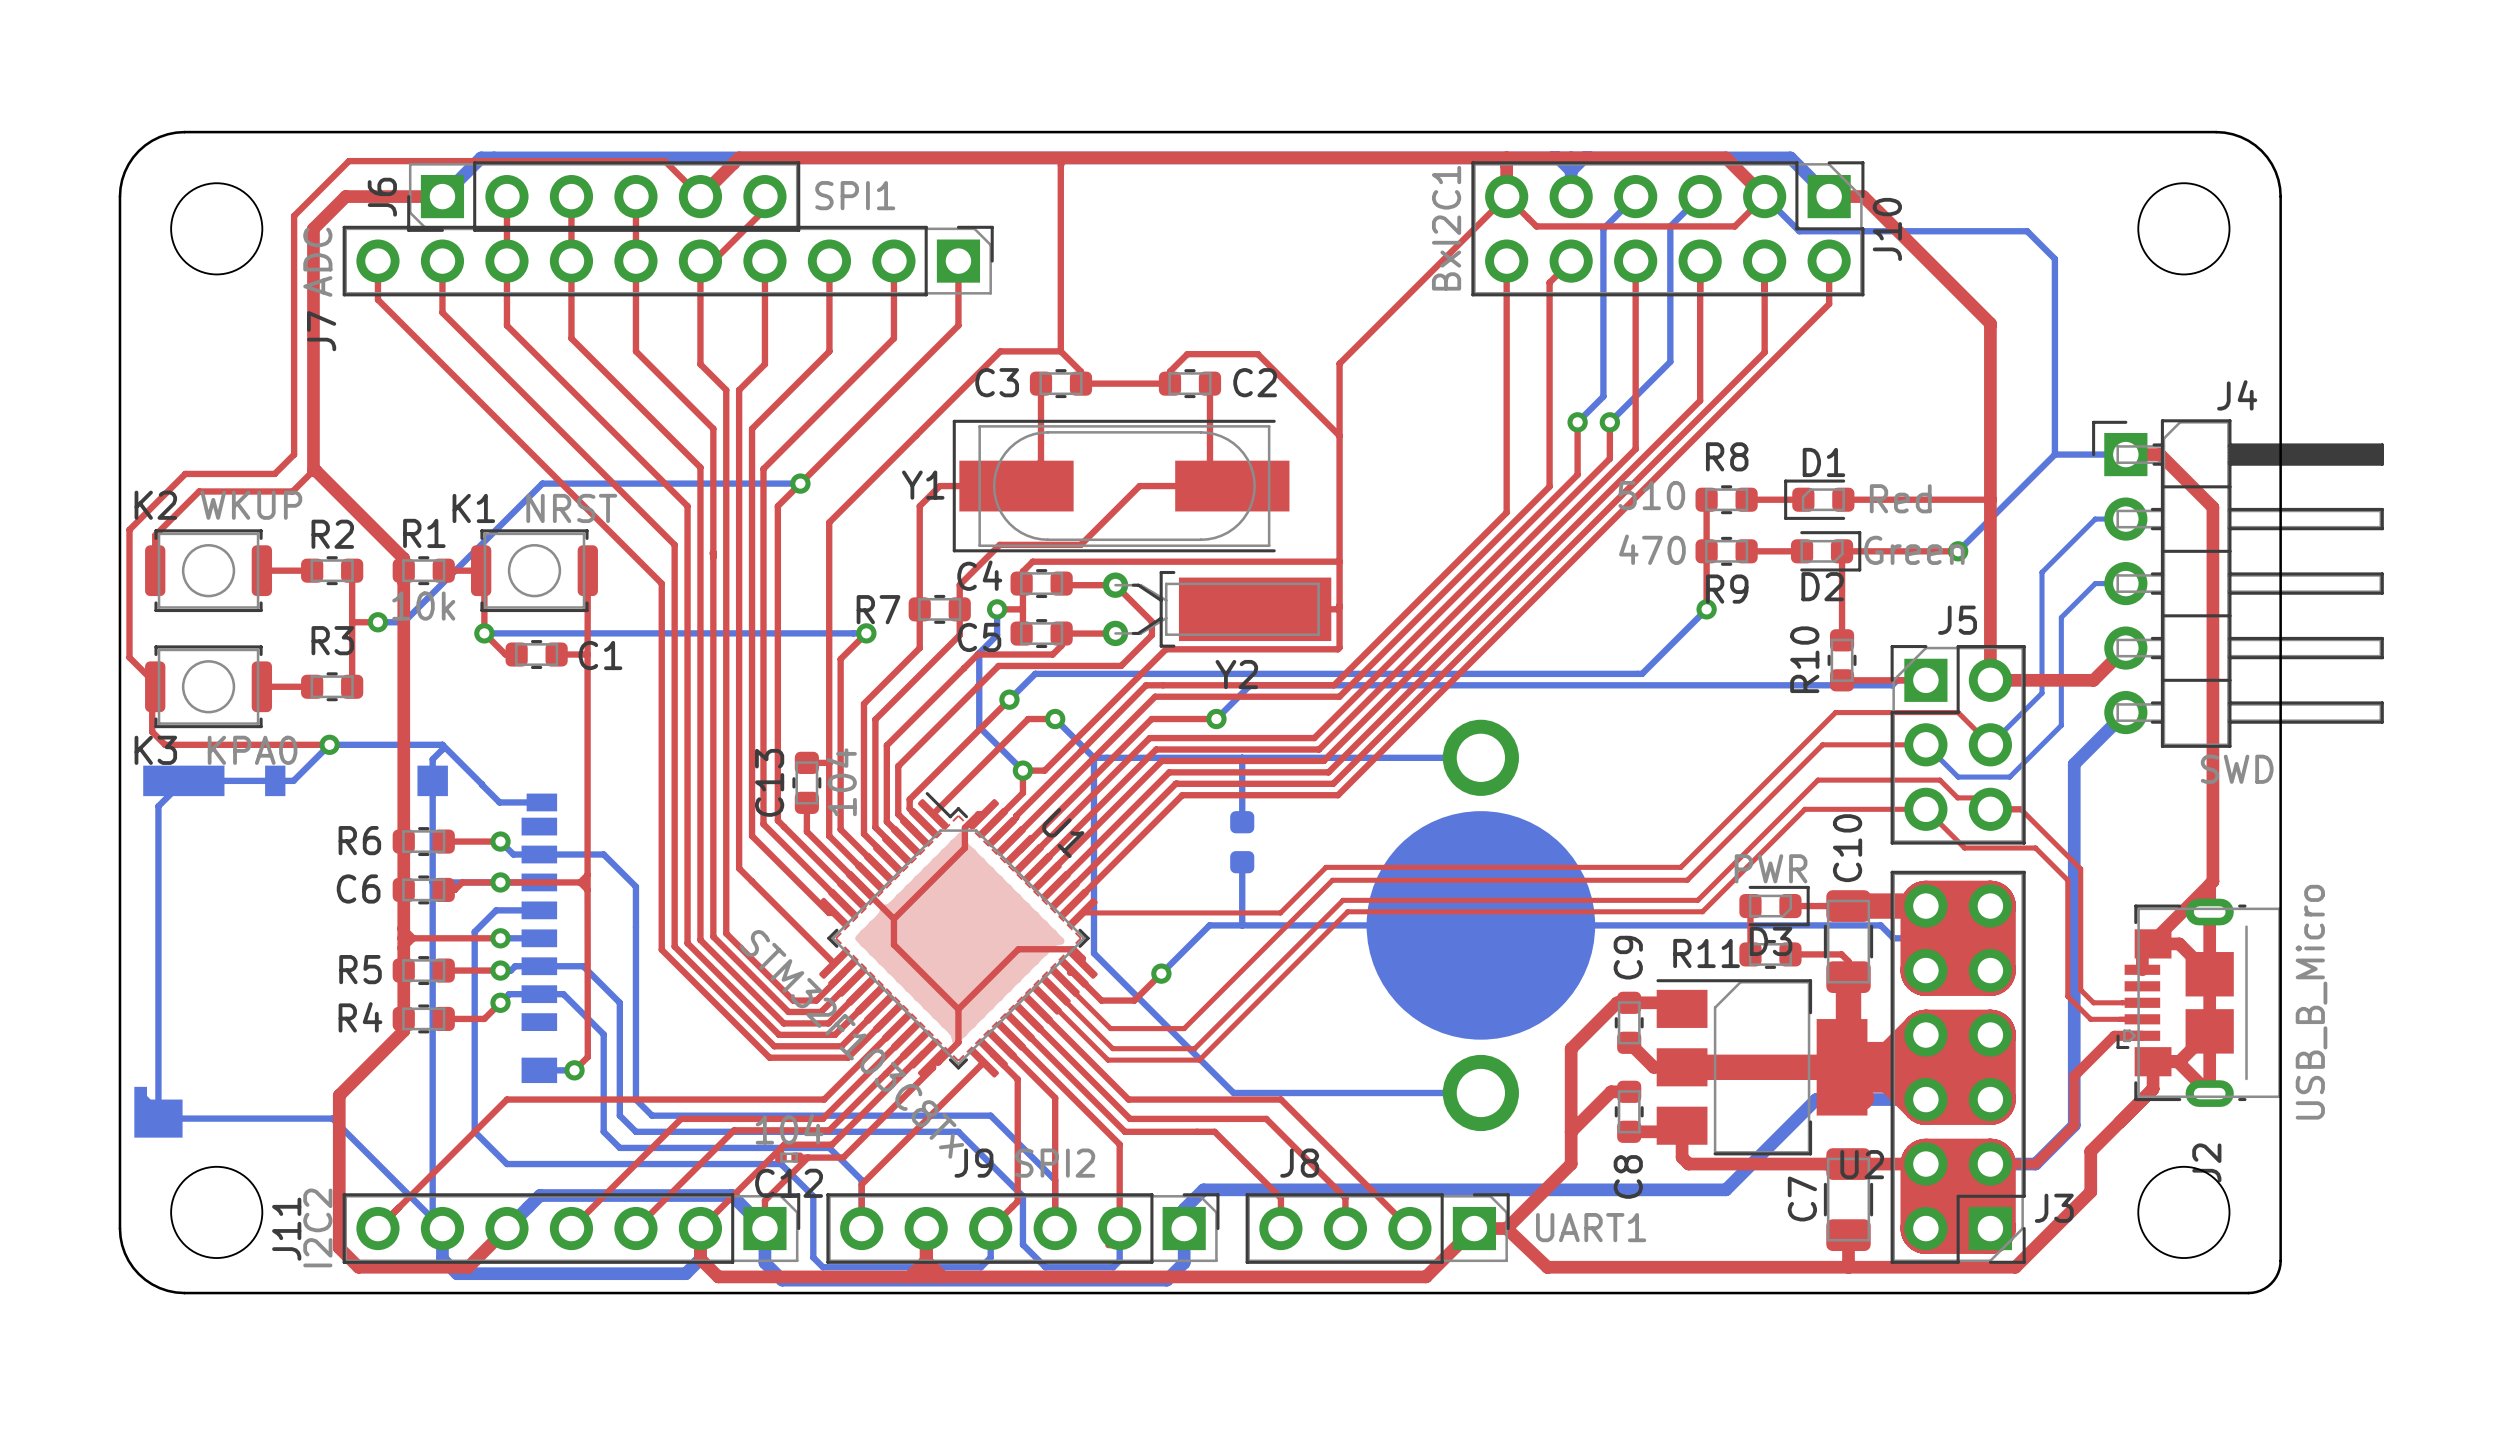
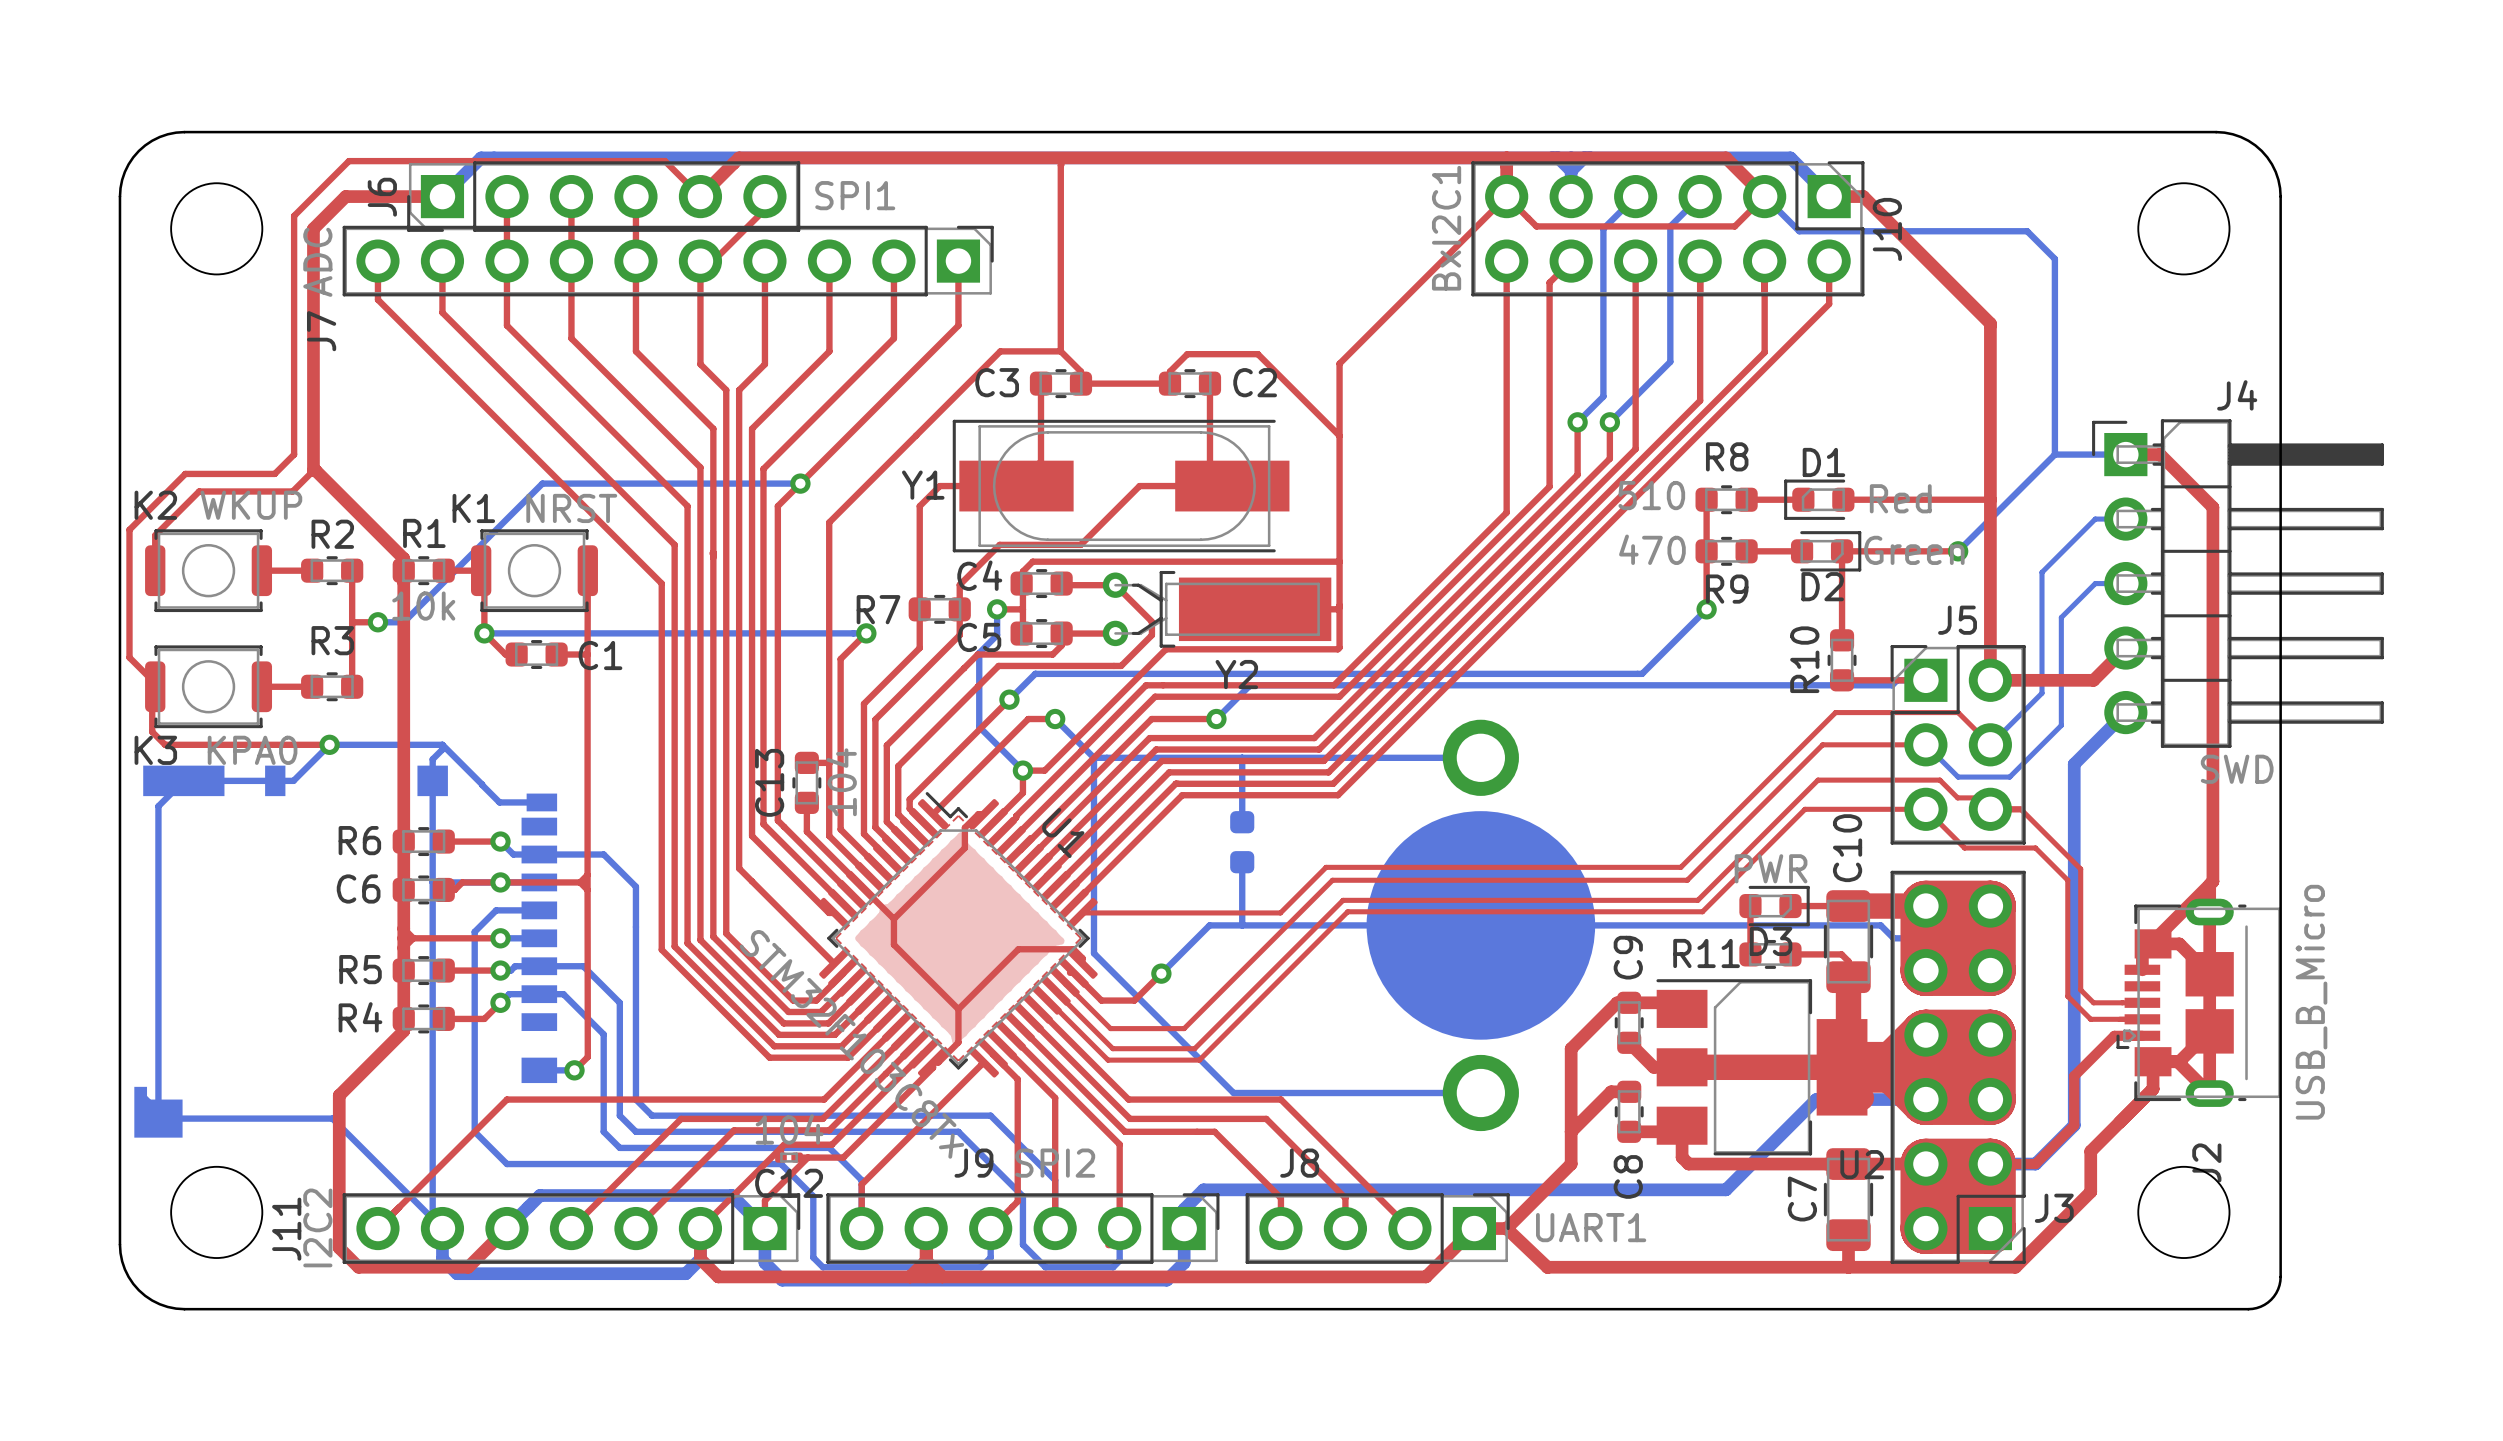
board edge: (119, 1228) (124, 1253) (138, 1274) (159, 1288) (184, 1293) (2248, 1293) (2260, 1290) (2271, 1283) (2278, 1273) (2280, 1260) -> (119, 1228) (122, 1261) (133, 1283) (145, 1295) (159, 1304) (184, 1309) (2248, 1309) (2264, 1304) (2276, 1293) (2280, 1281) (2280, 1260)

